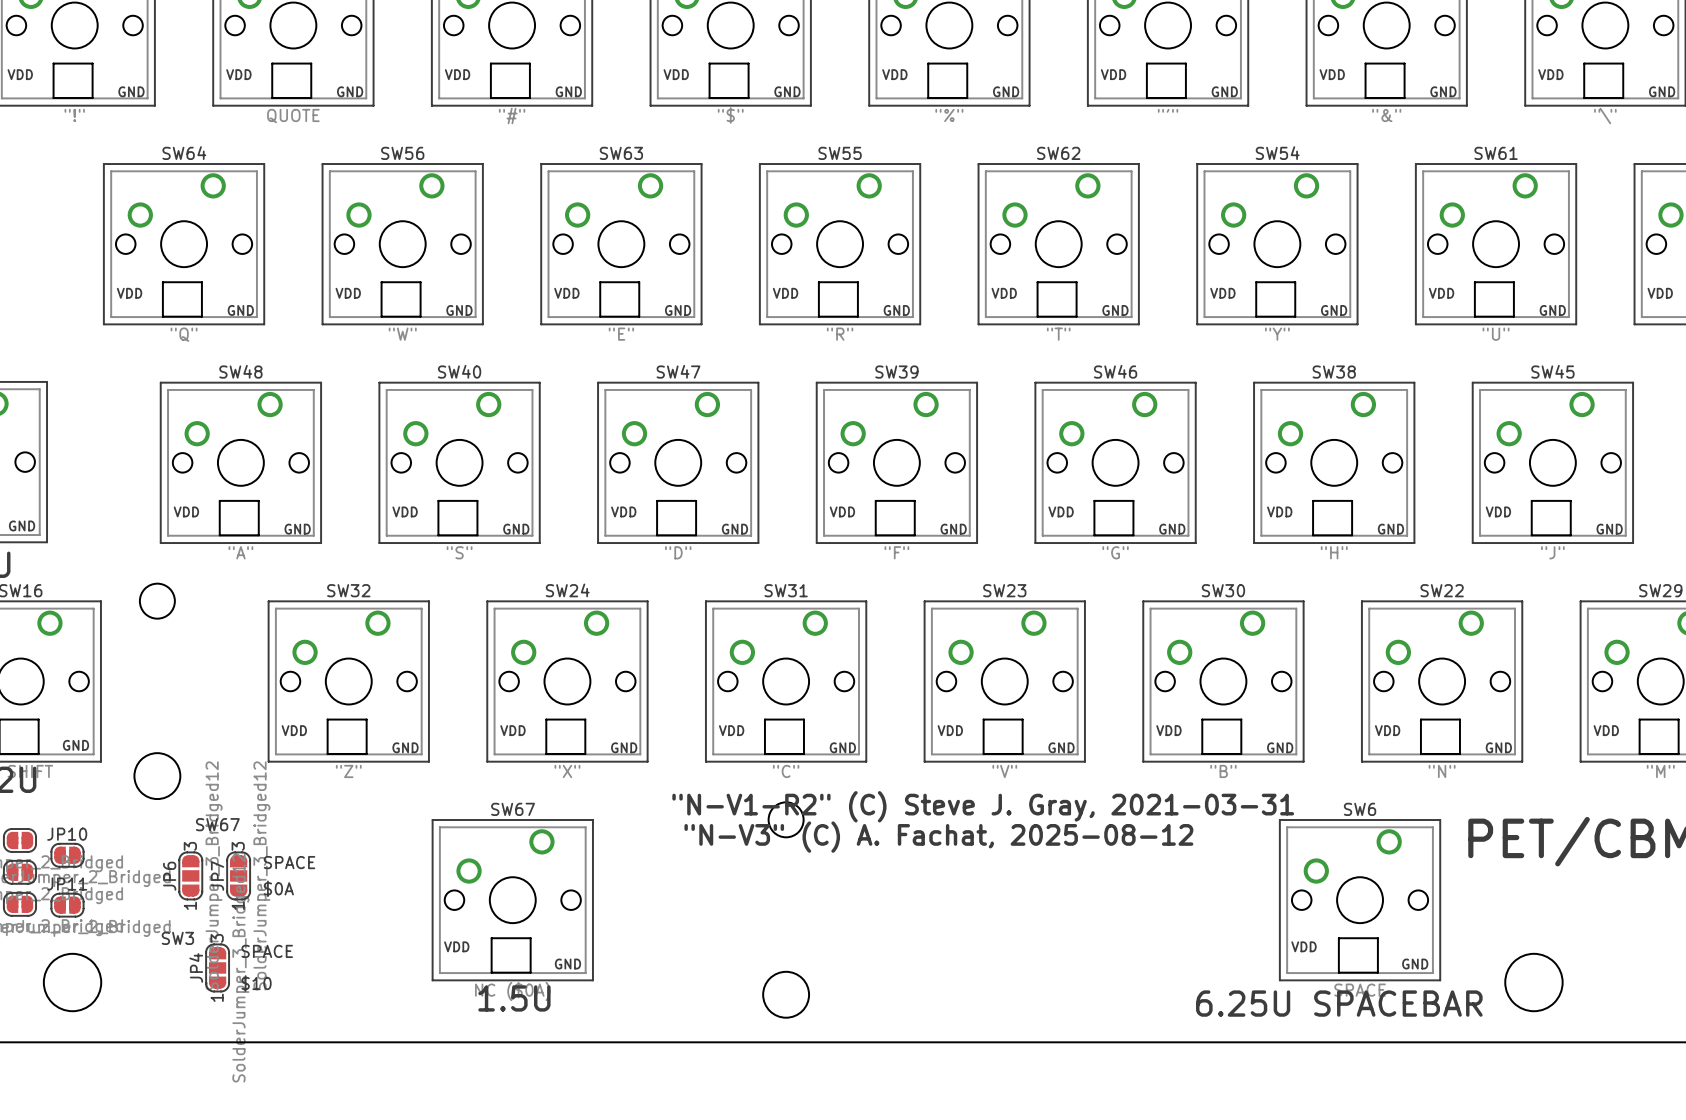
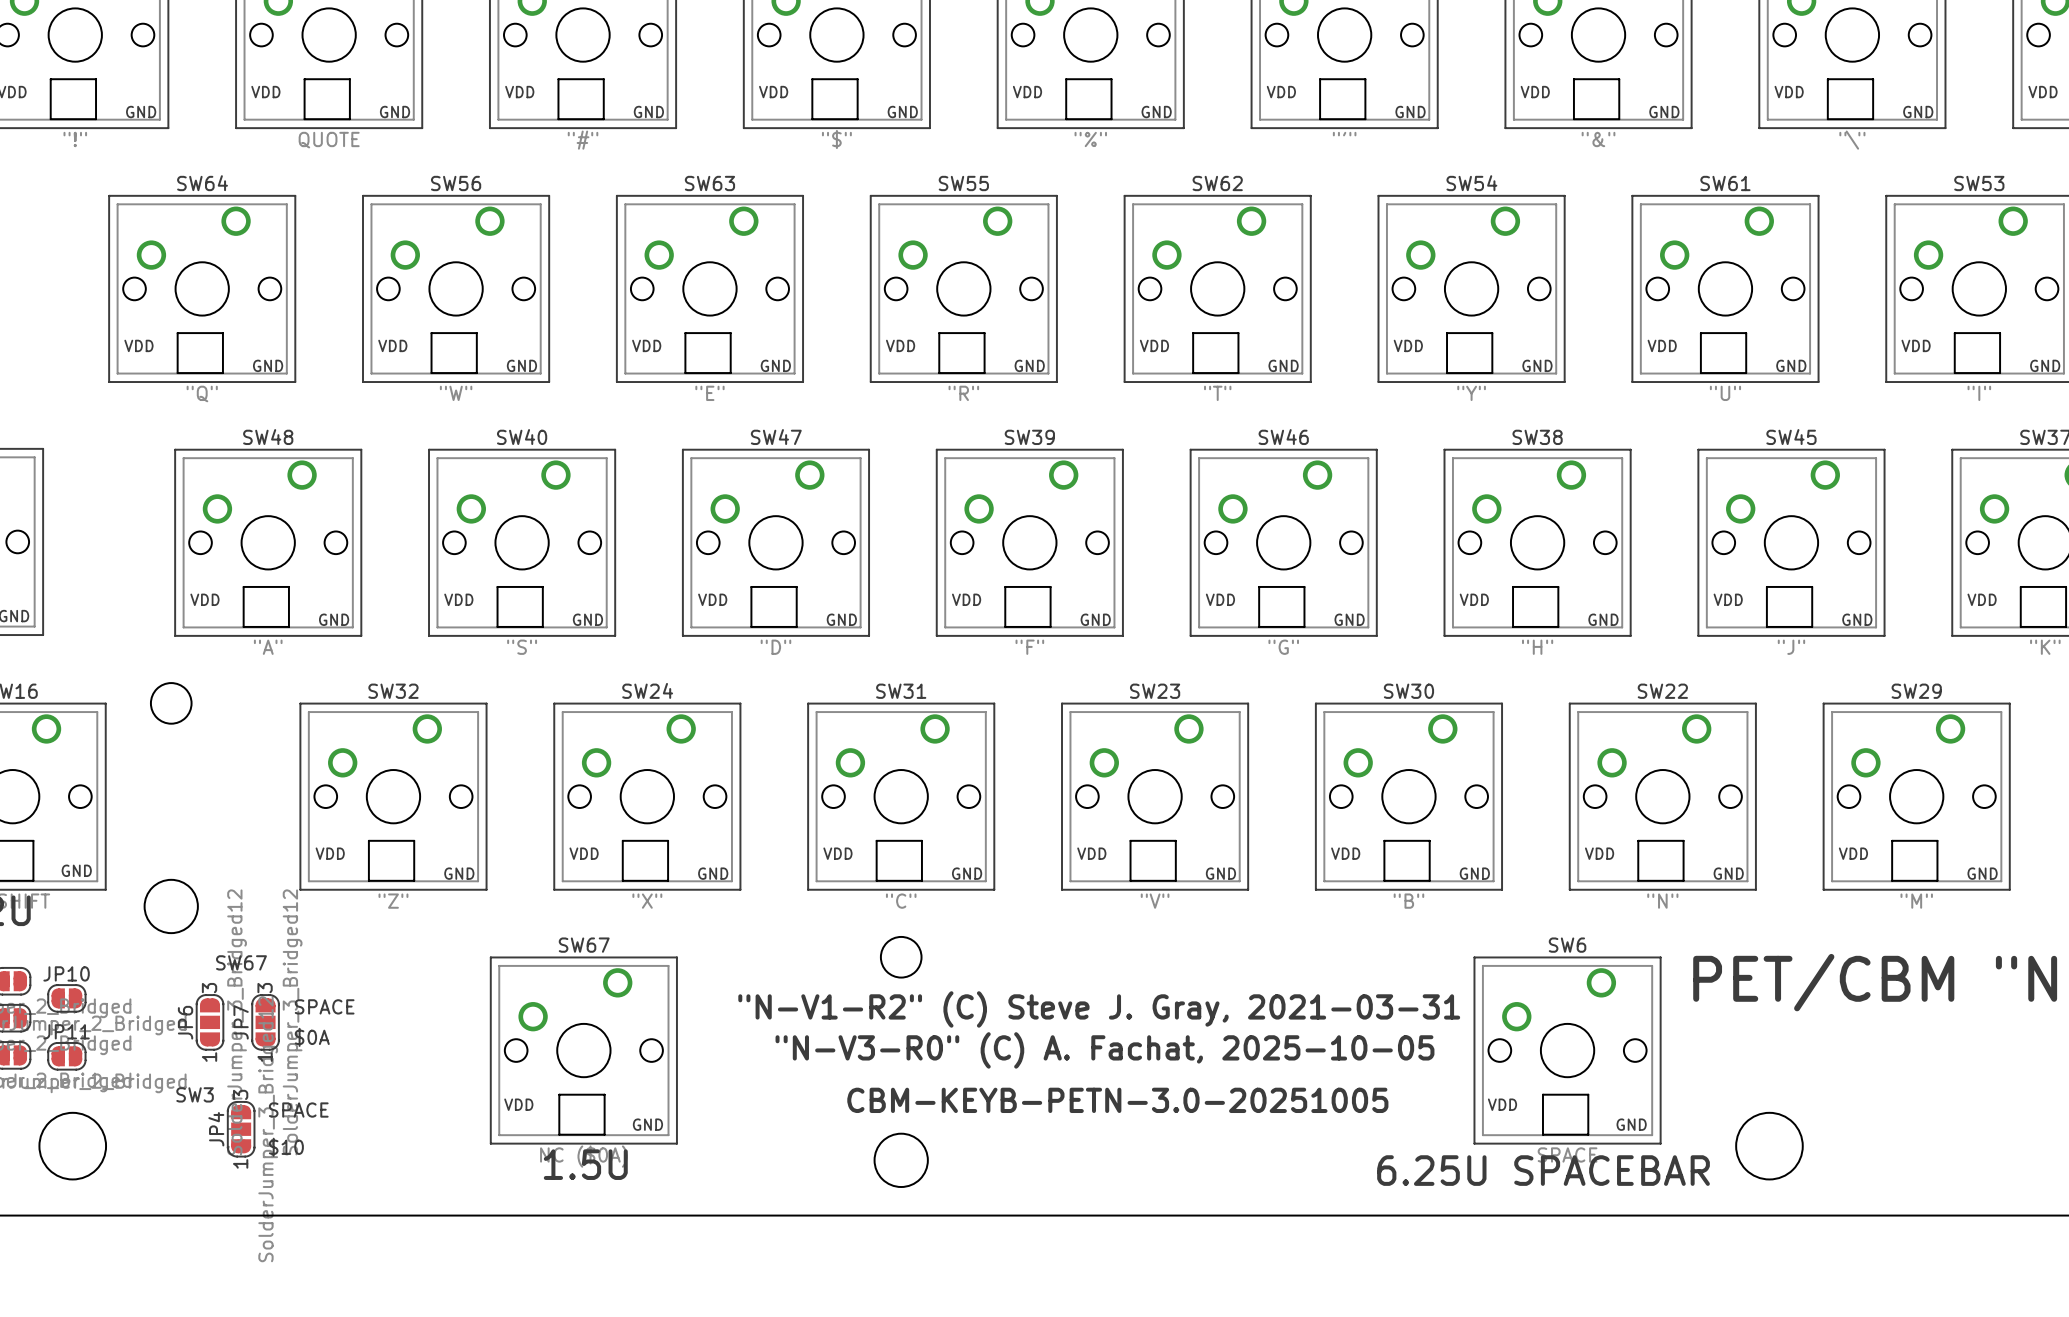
text position: "N-V1-R2" (C) Steve J. Gray, 2021-03-31 (983, 806) -> "N-V1-R2" (C) Steve J. Gray, 2021-03-31 (1099, 1009)
text: "N-V3" (C) A. Fachat, 2025-08-12 (938, 837) -> none
text: none -> "N-V3-R0" (C) A. Fachat, 2025-10-05 (1104, 1050)
text: none -> CBM-KEYB-PETN-3.0-20251005 (1117, 1100)

